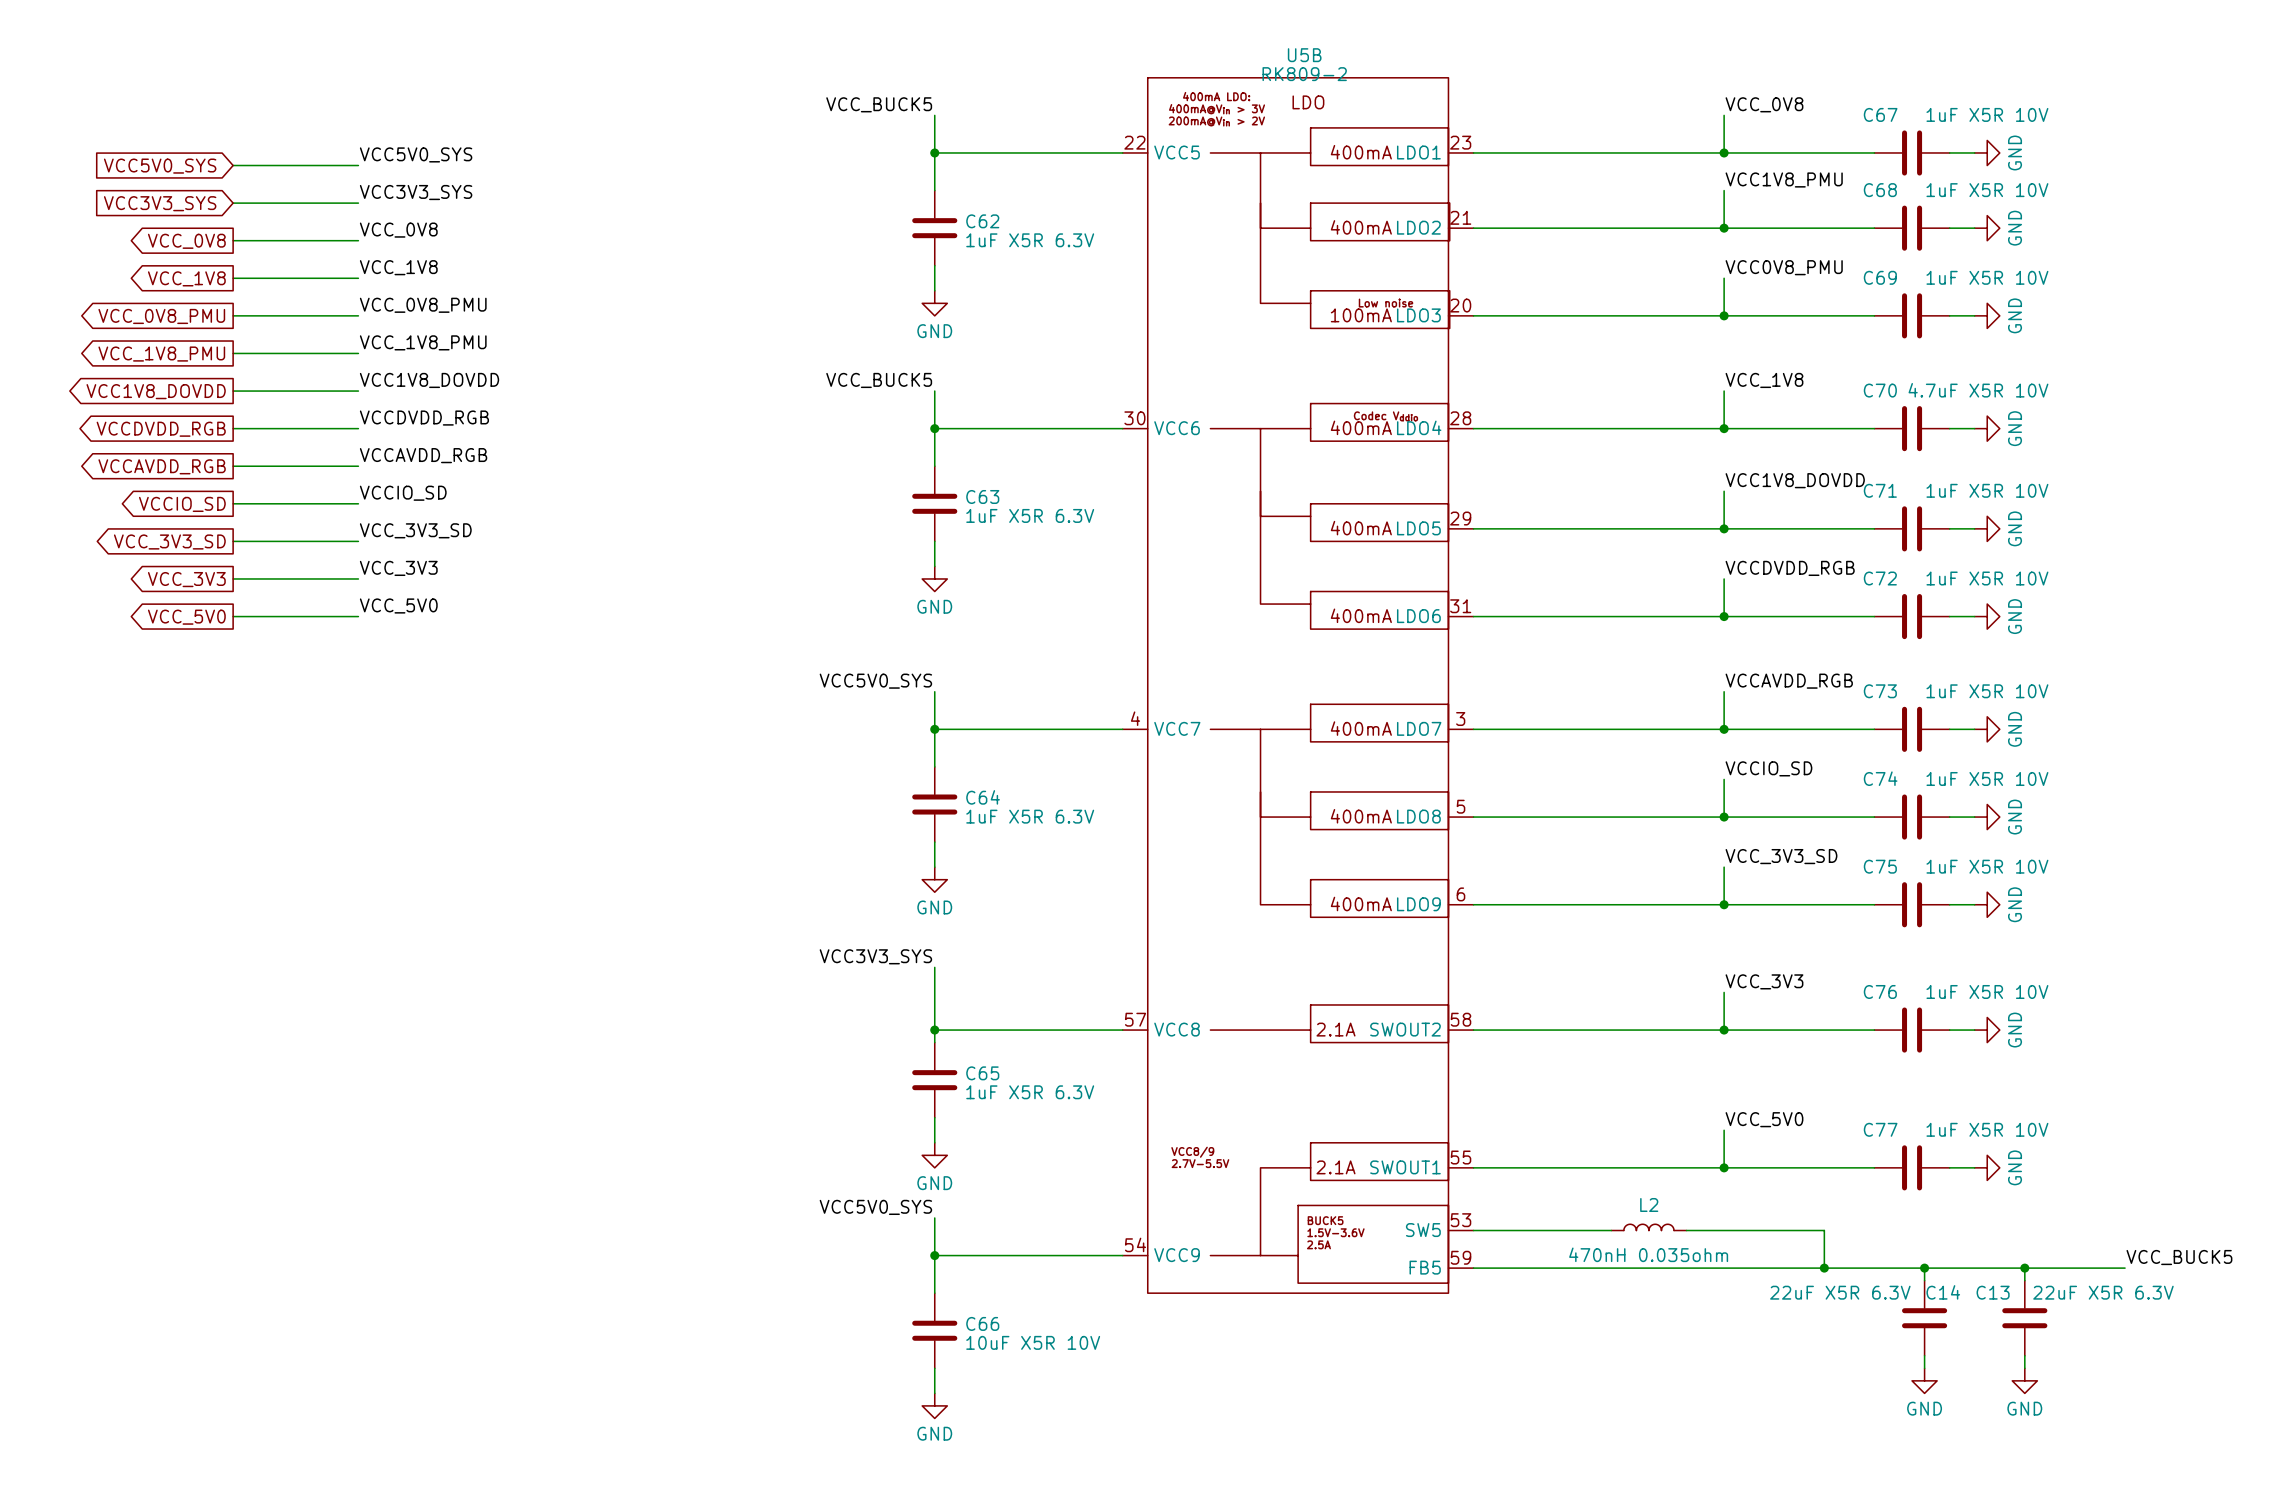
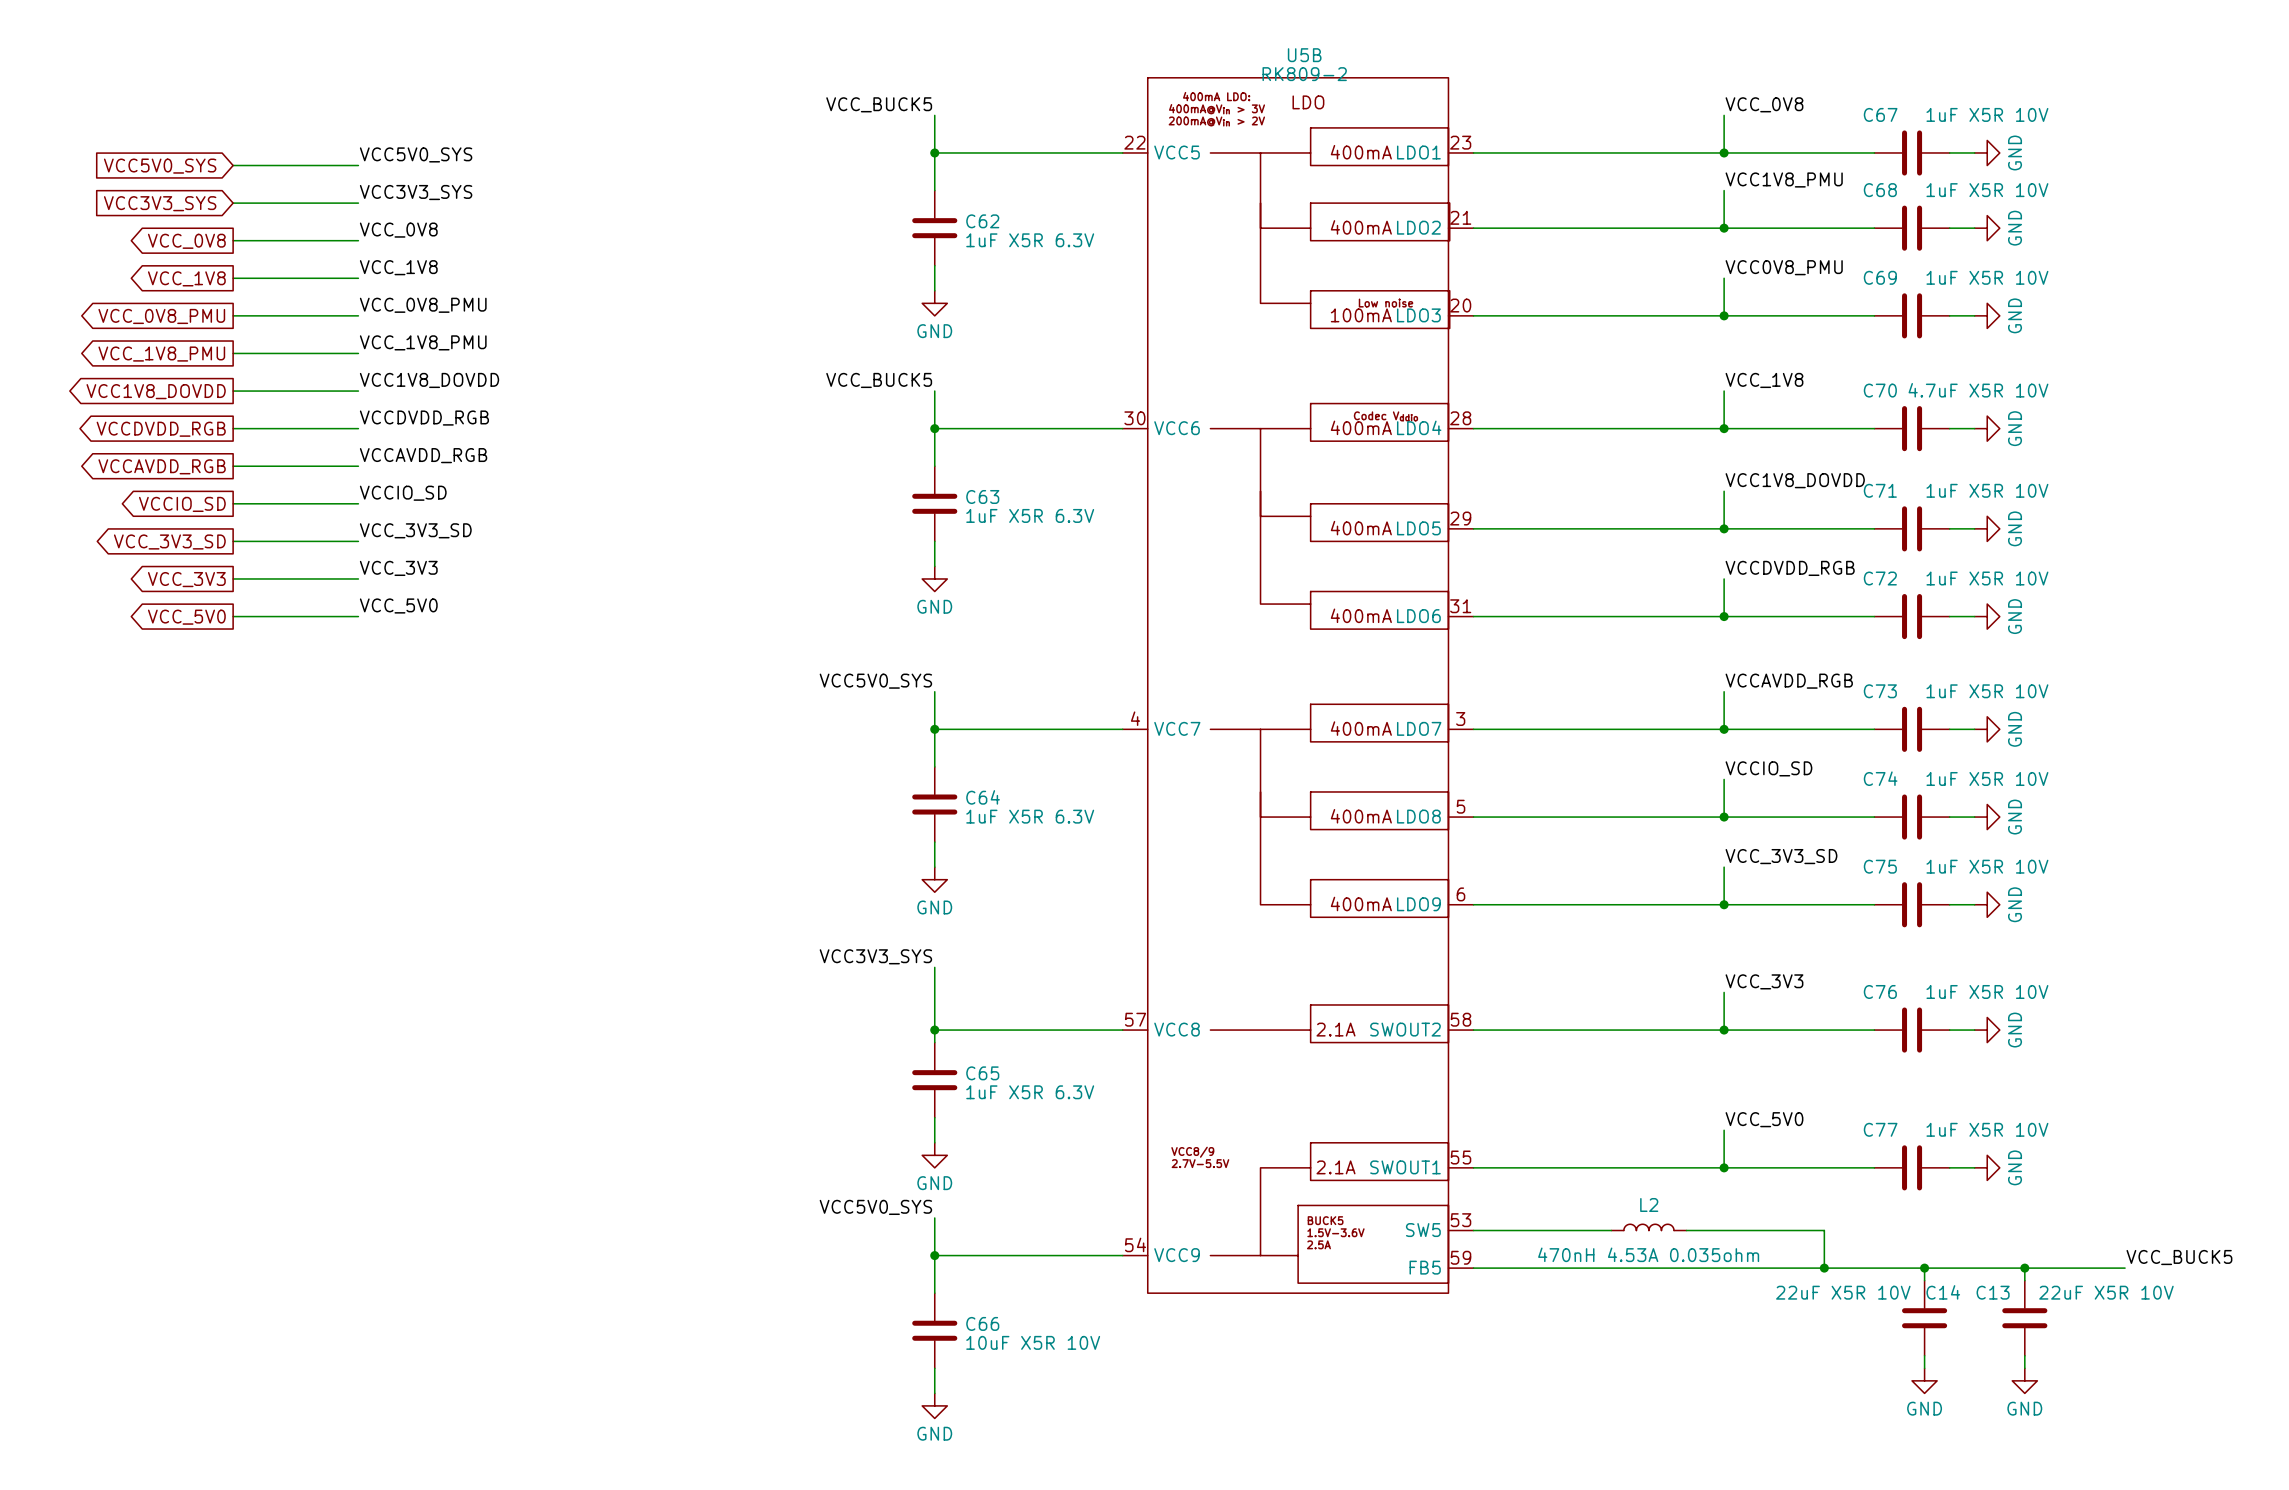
L2 value: 470nH 0.035ohm (1648, 1254) -> 470nH 4.53A 0.035ohm (1648, 1254)
C14 value: 22uF X5R 6.3V (1840, 1292) -> 22uF X5R 10V (1843, 1292)
C13 value: 22uF X5R 6.3V (2103, 1292) -> 22uF X5R 10V (2106, 1292)

